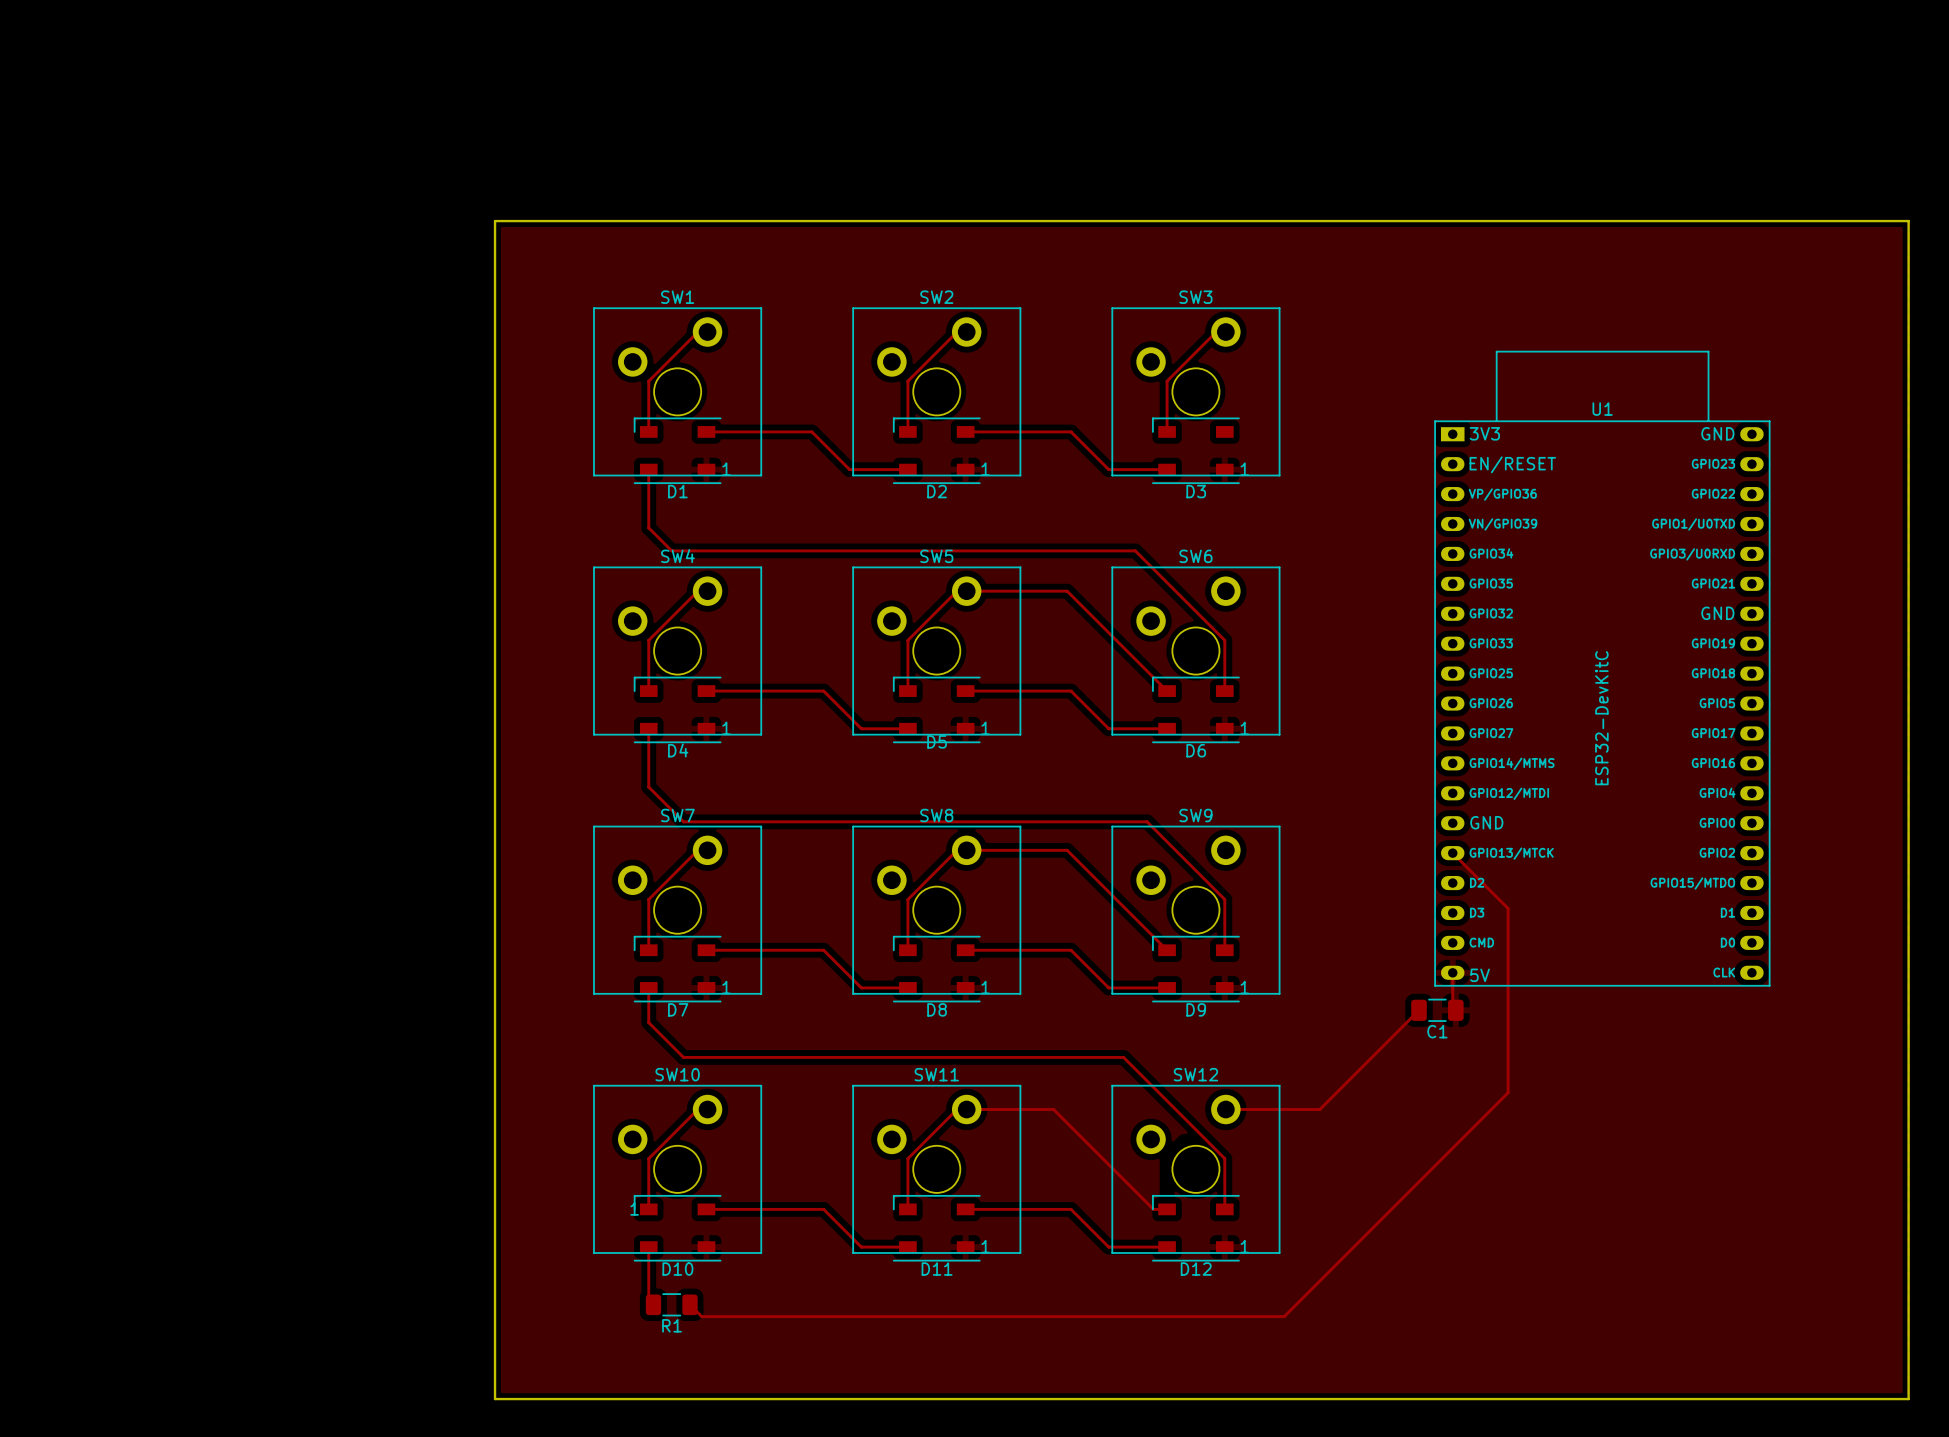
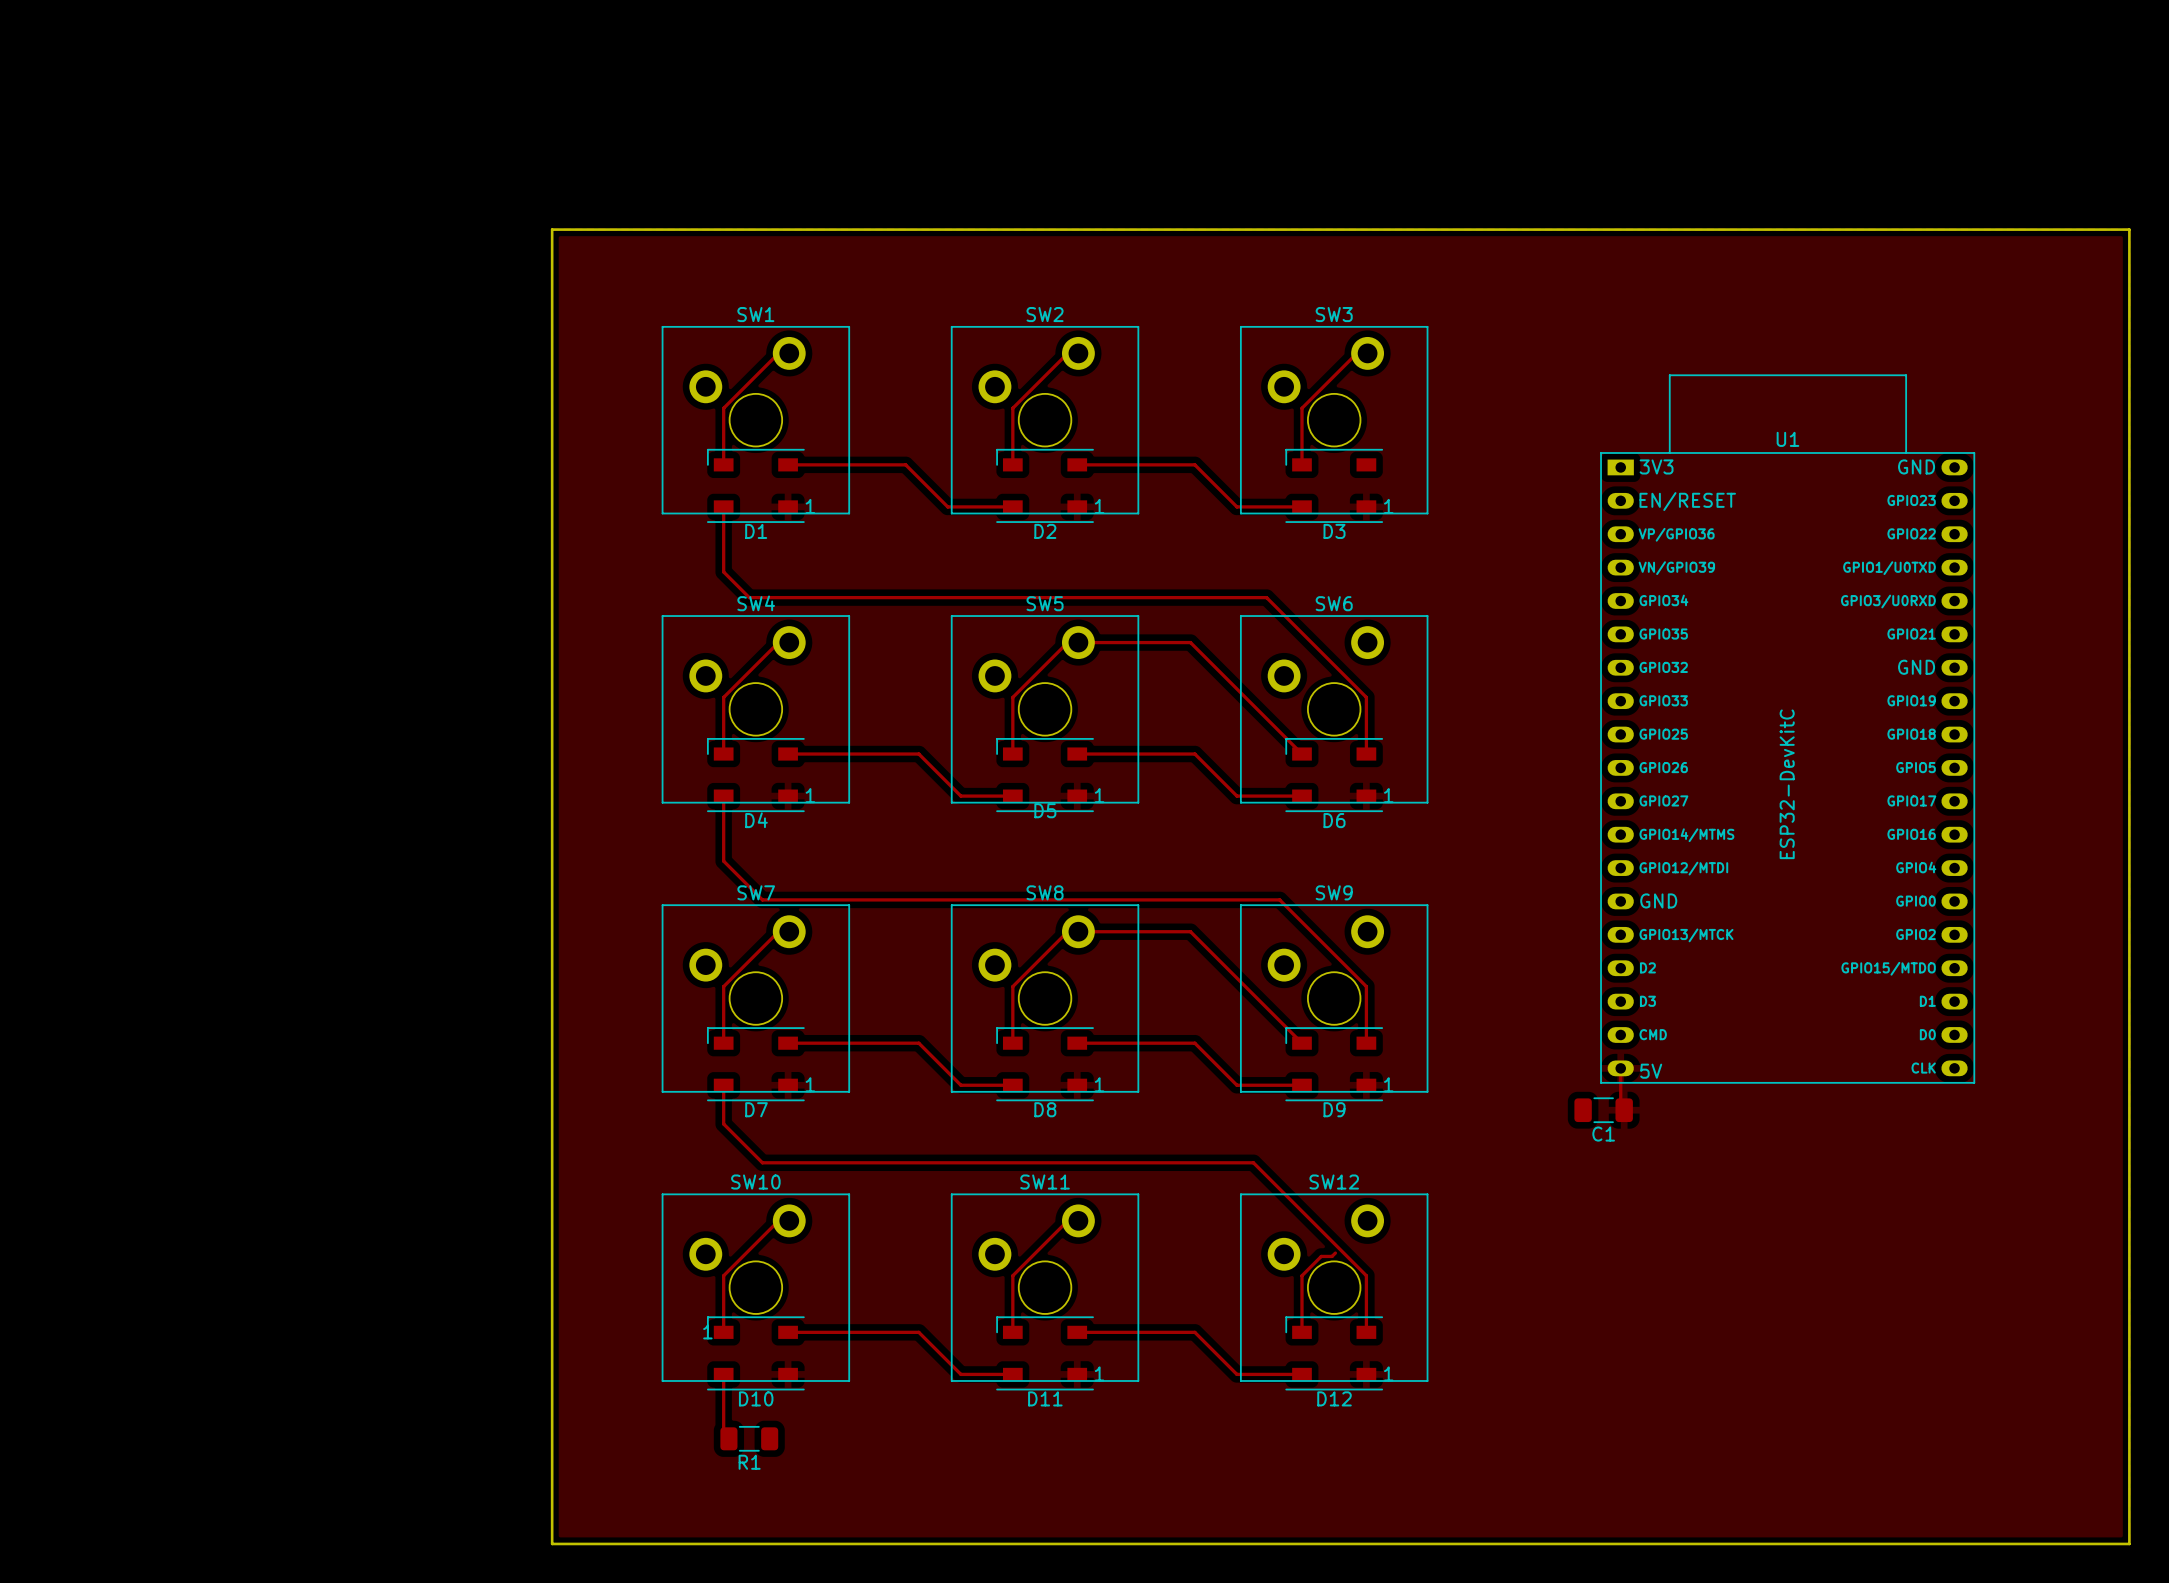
track: (1452, 853) (1508, 908) (1508, 1092) (1284, 1316) (701, 1316) (689, 1304) -> none
track: (1419, 1010) (1319, 1109) (1225, 1109) -> none
track: (966, 1109) (1053, 1109) (1153, 1209) (1167, 1209) -> (1335, 1253) (1332, 1256) (1321, 1256) (1301, 1275) (1301, 1332)

